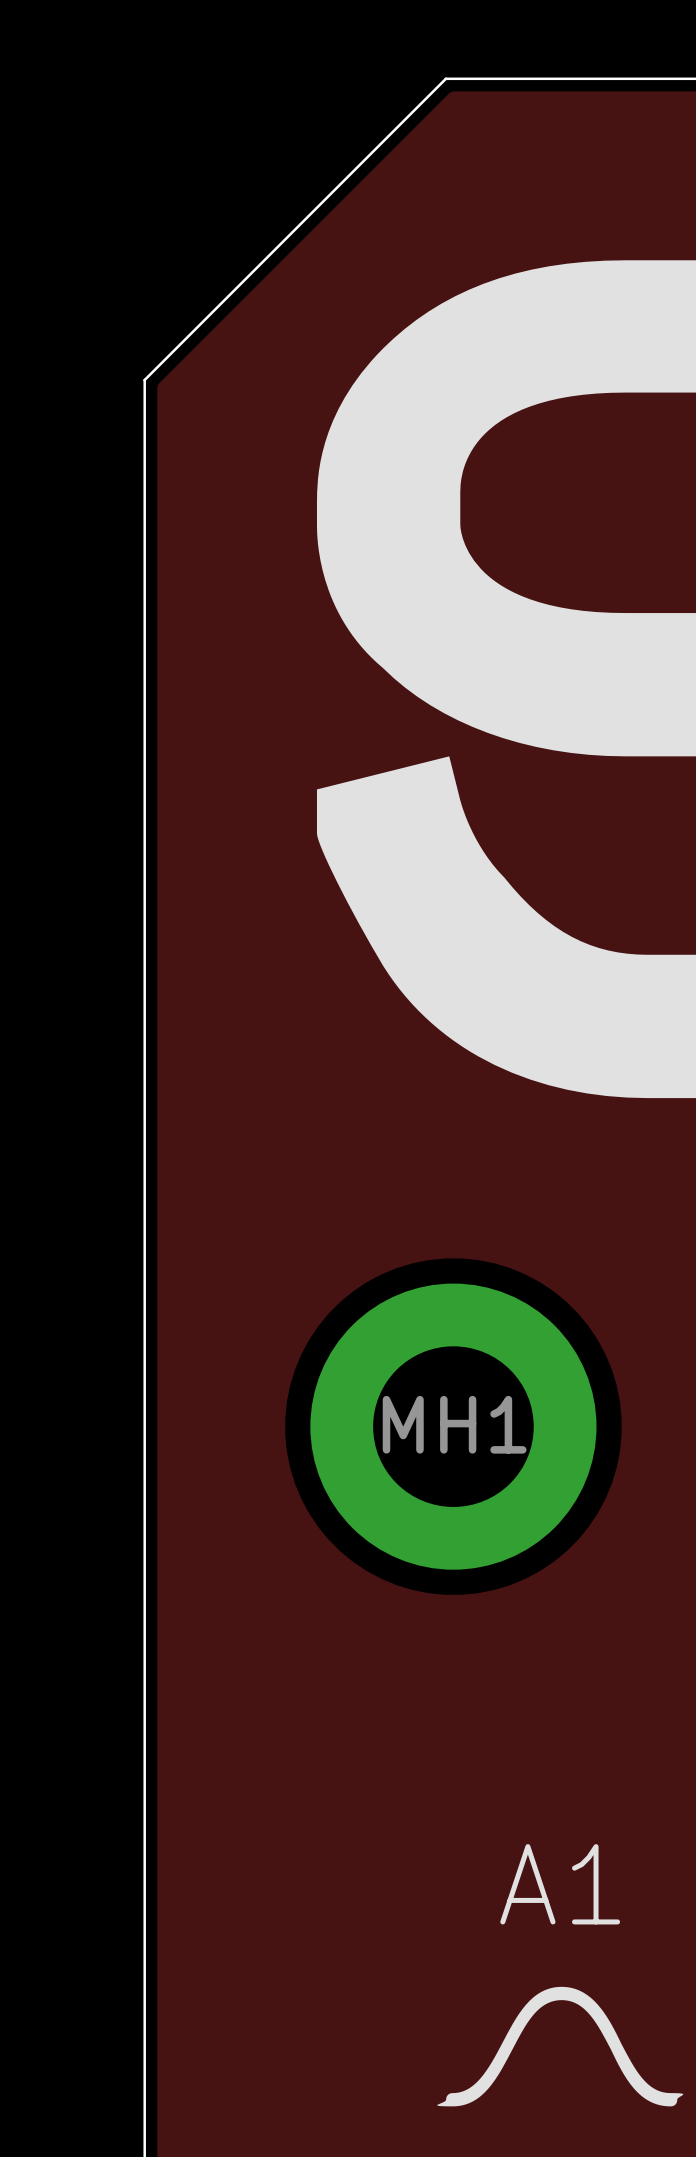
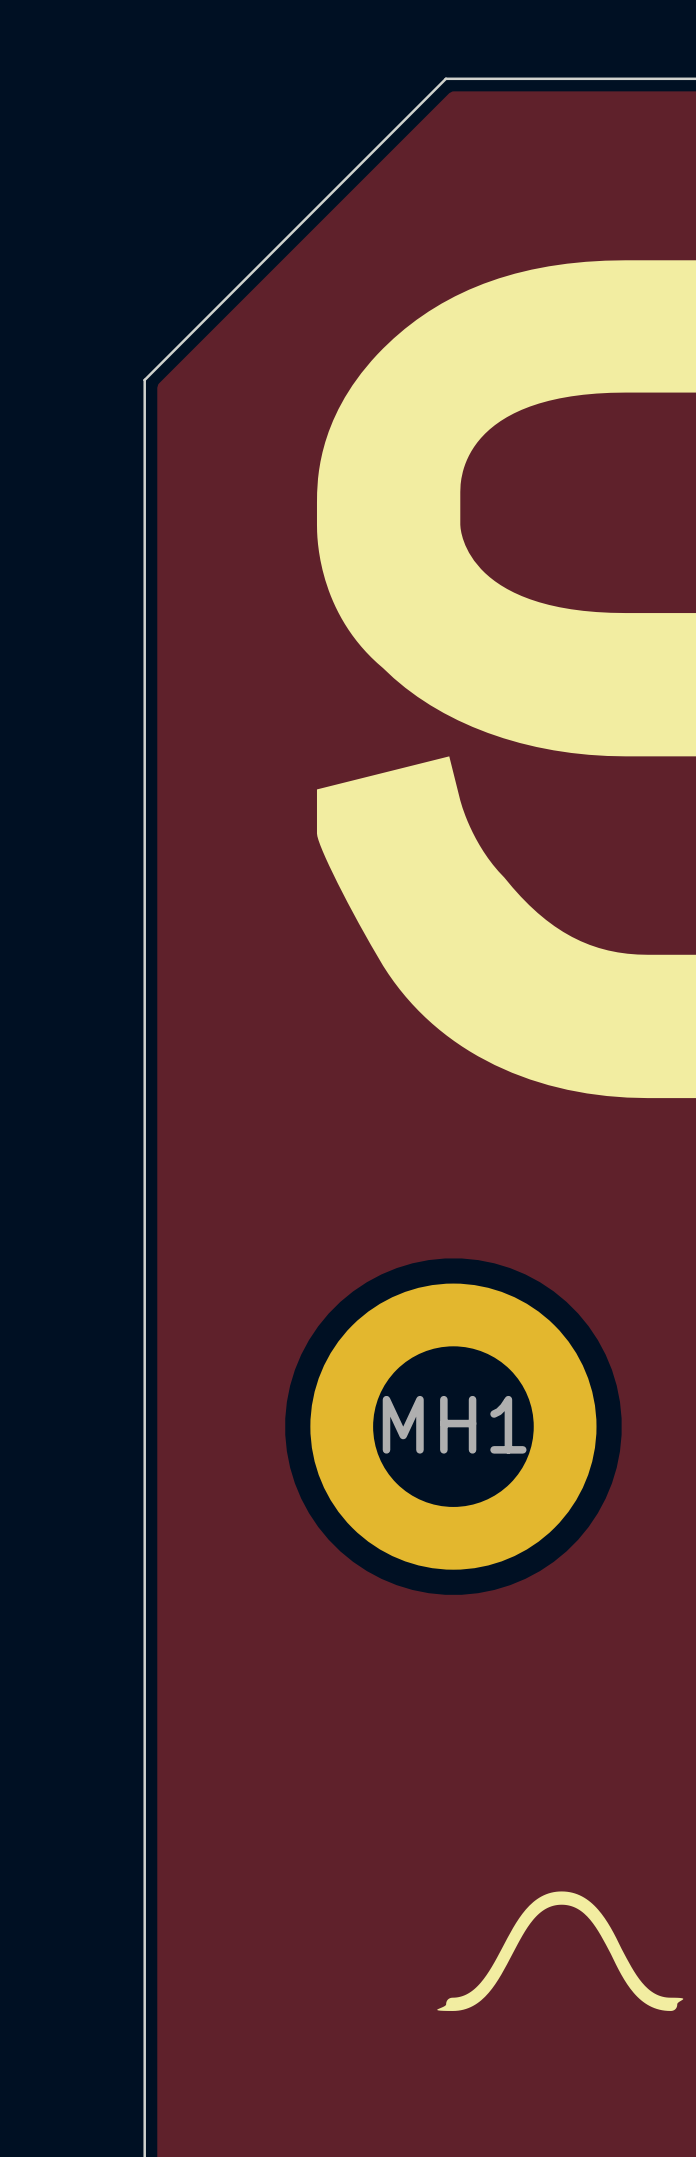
text: A1 (560, 1884) -> none
drawing position: (560, 2046) -> (560, 1951)

